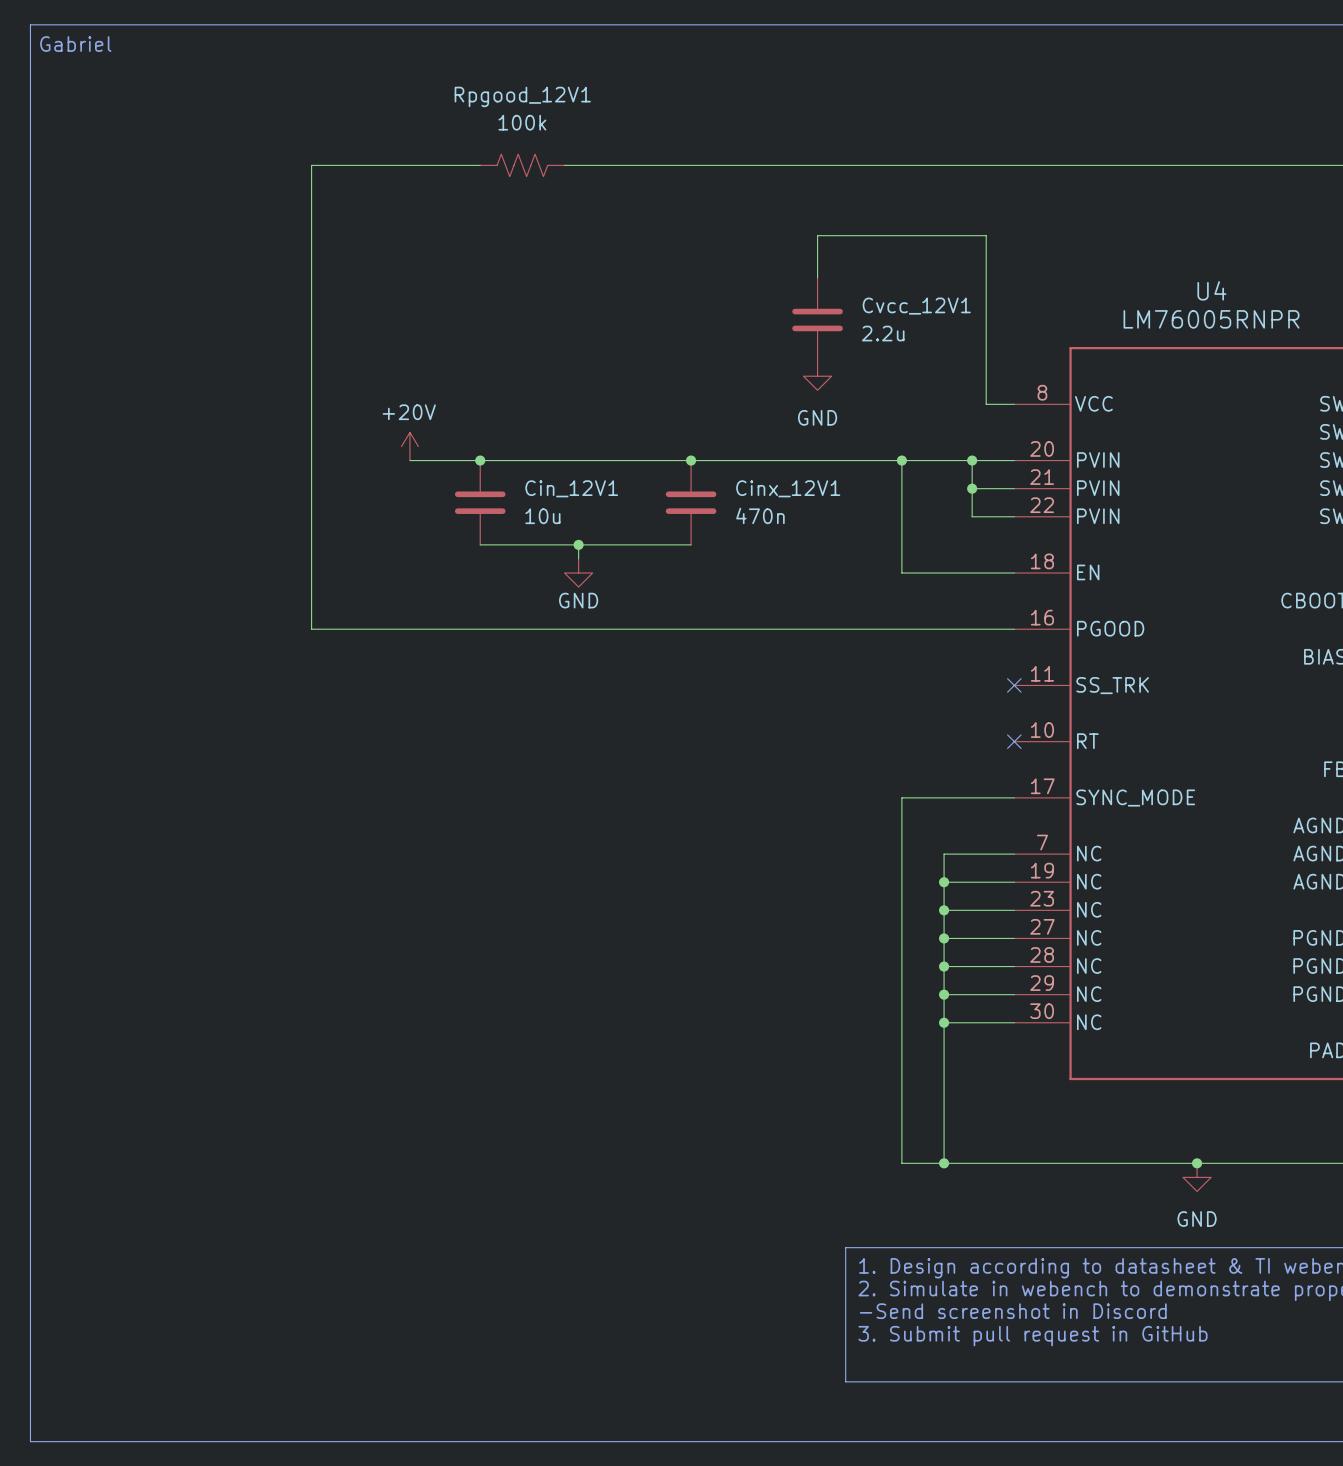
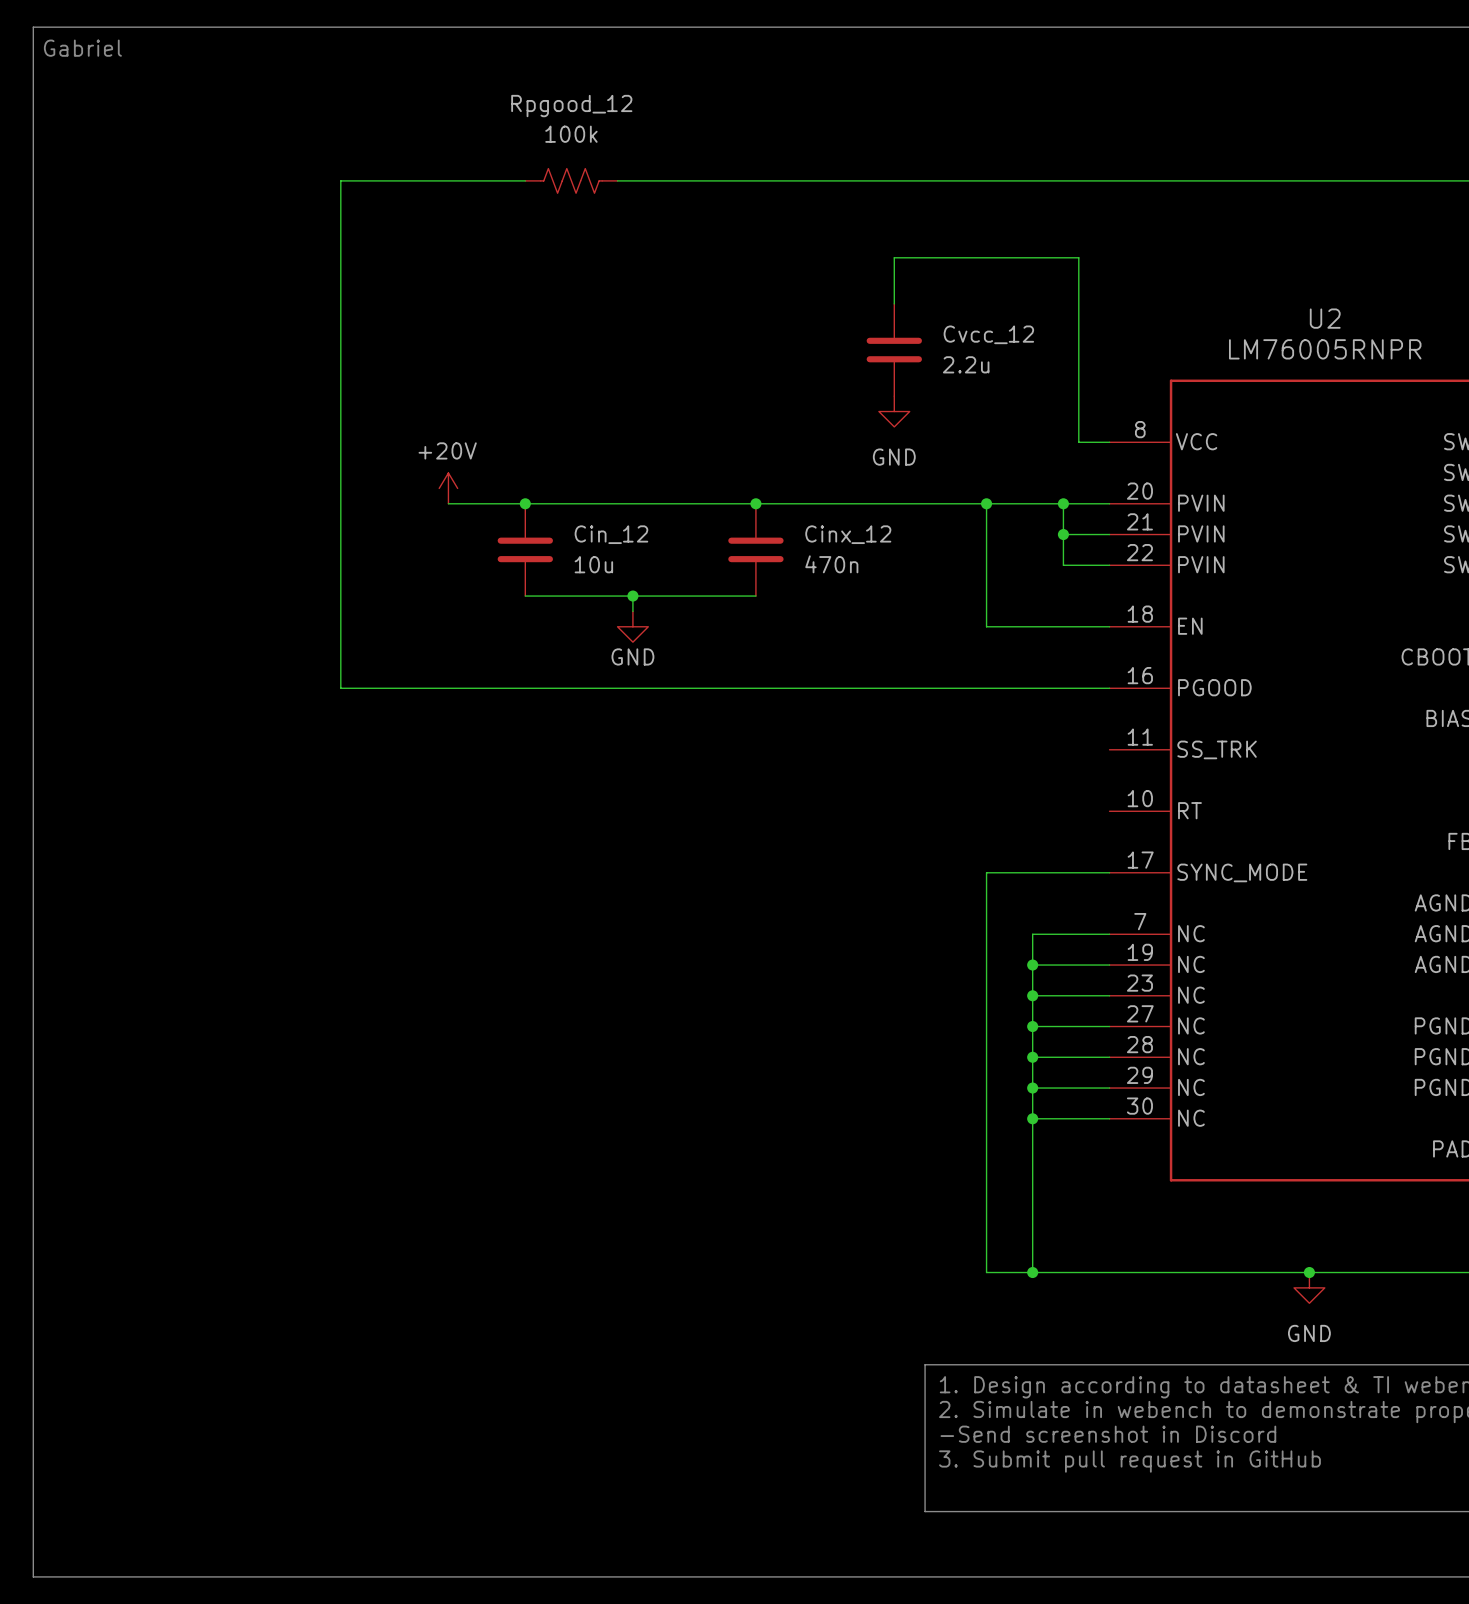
Rpgood_12V1 name: Rpgood_12V1 (522, 96) -> Rpgood_12 (571, 106)
U4 name: U4 (1211, 290) -> U2 (1325, 318)
Cvcc_12V1 name: Cvcc_12V1 (916, 306) -> Cvcc_12 (988, 334)
Cin_12V1 name: Cin_12V1 (571, 488) -> Cin_12 (611, 534)
Cinx_12V1 name: Cinx_12V1 (788, 488) -> Cinx_12 (848, 534)
no-connect mark: (1014, 685) -> none
no-connect mark: (1014, 741) -> none

